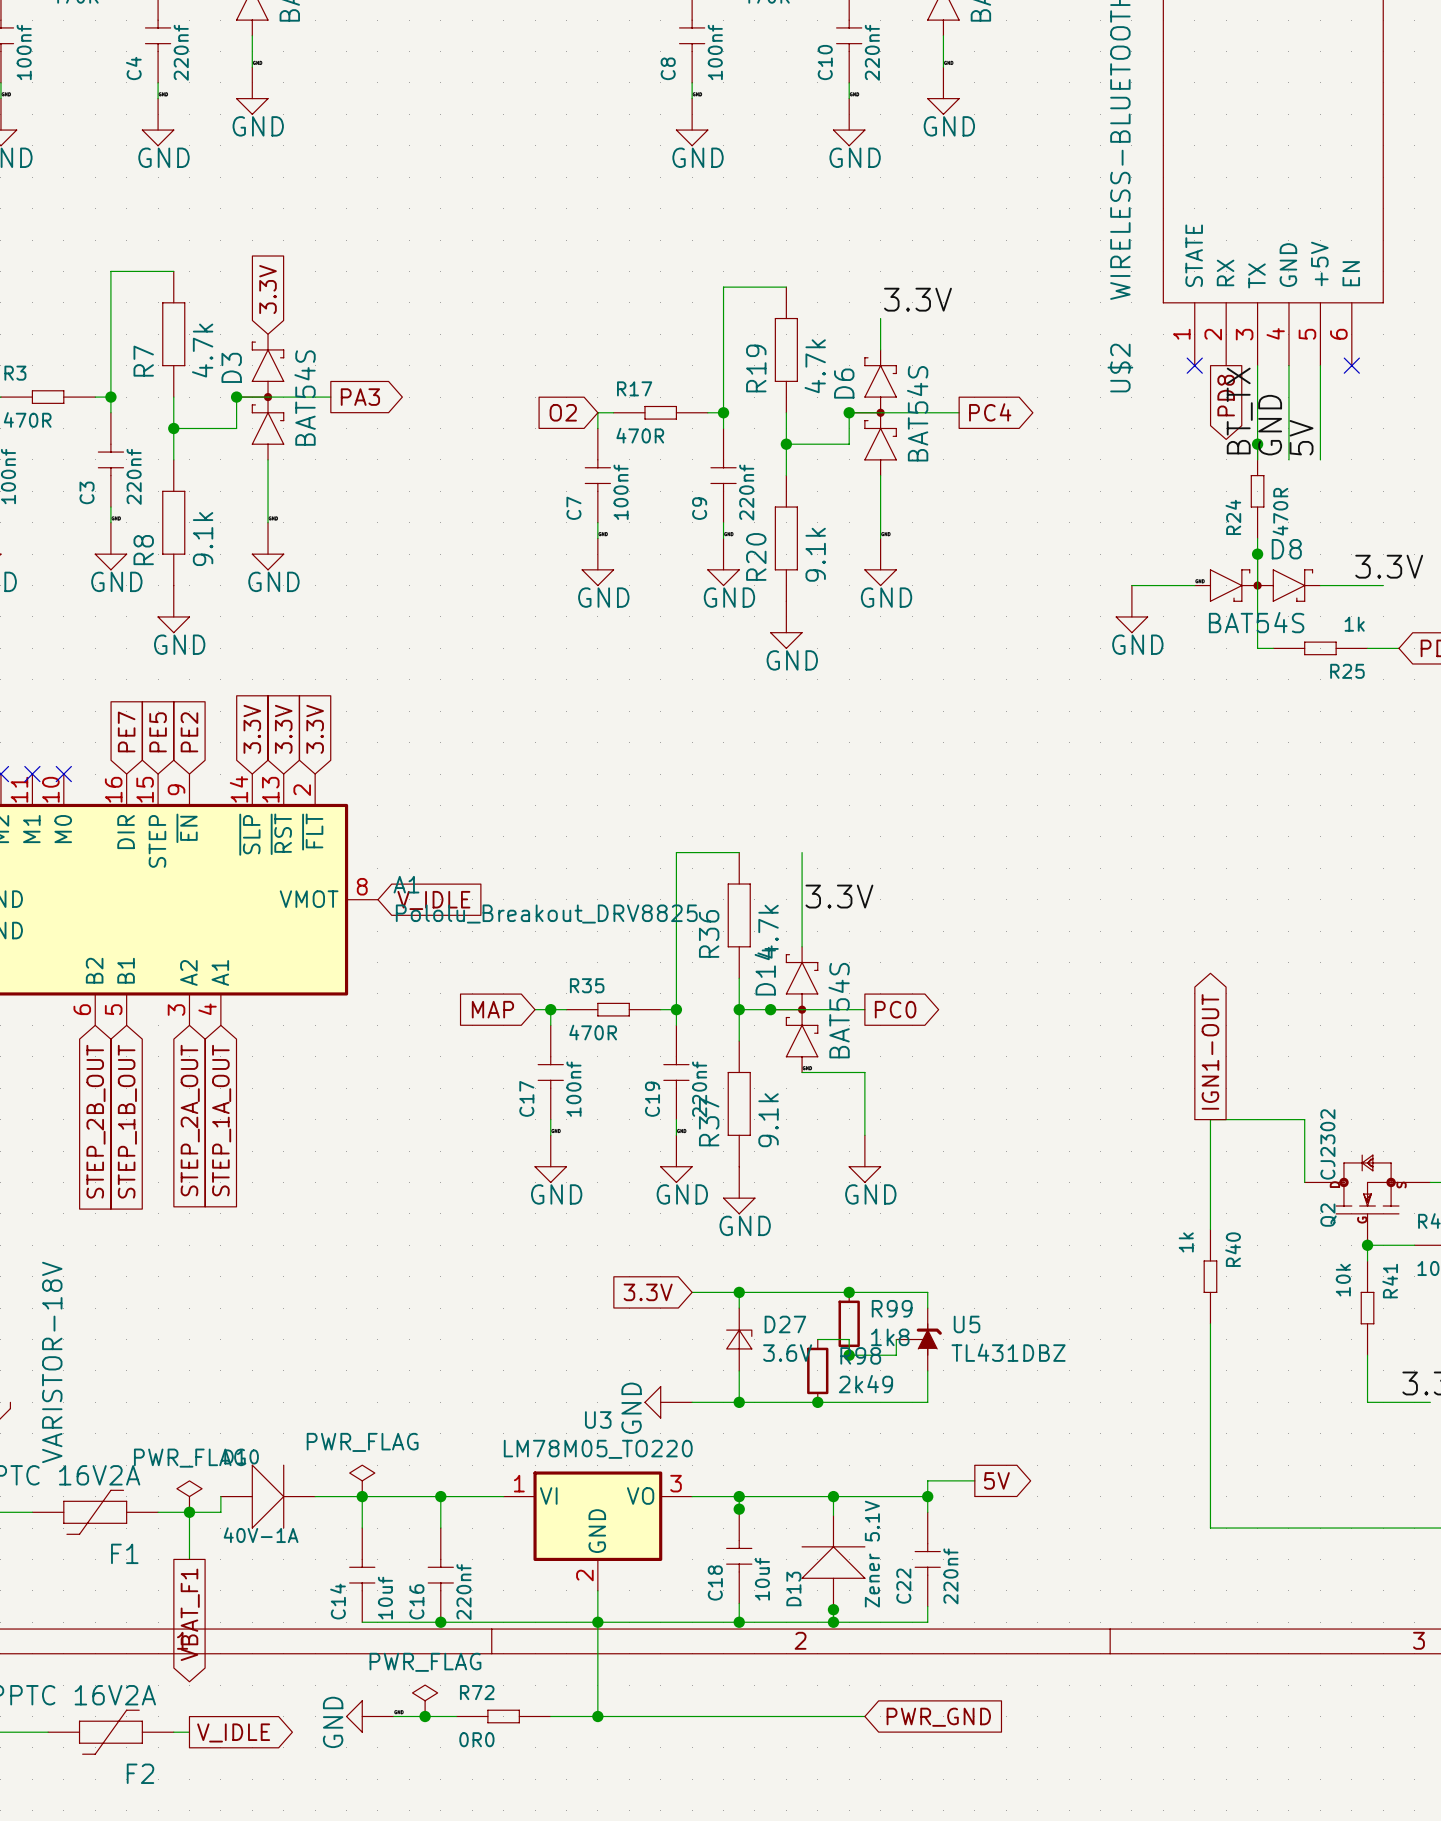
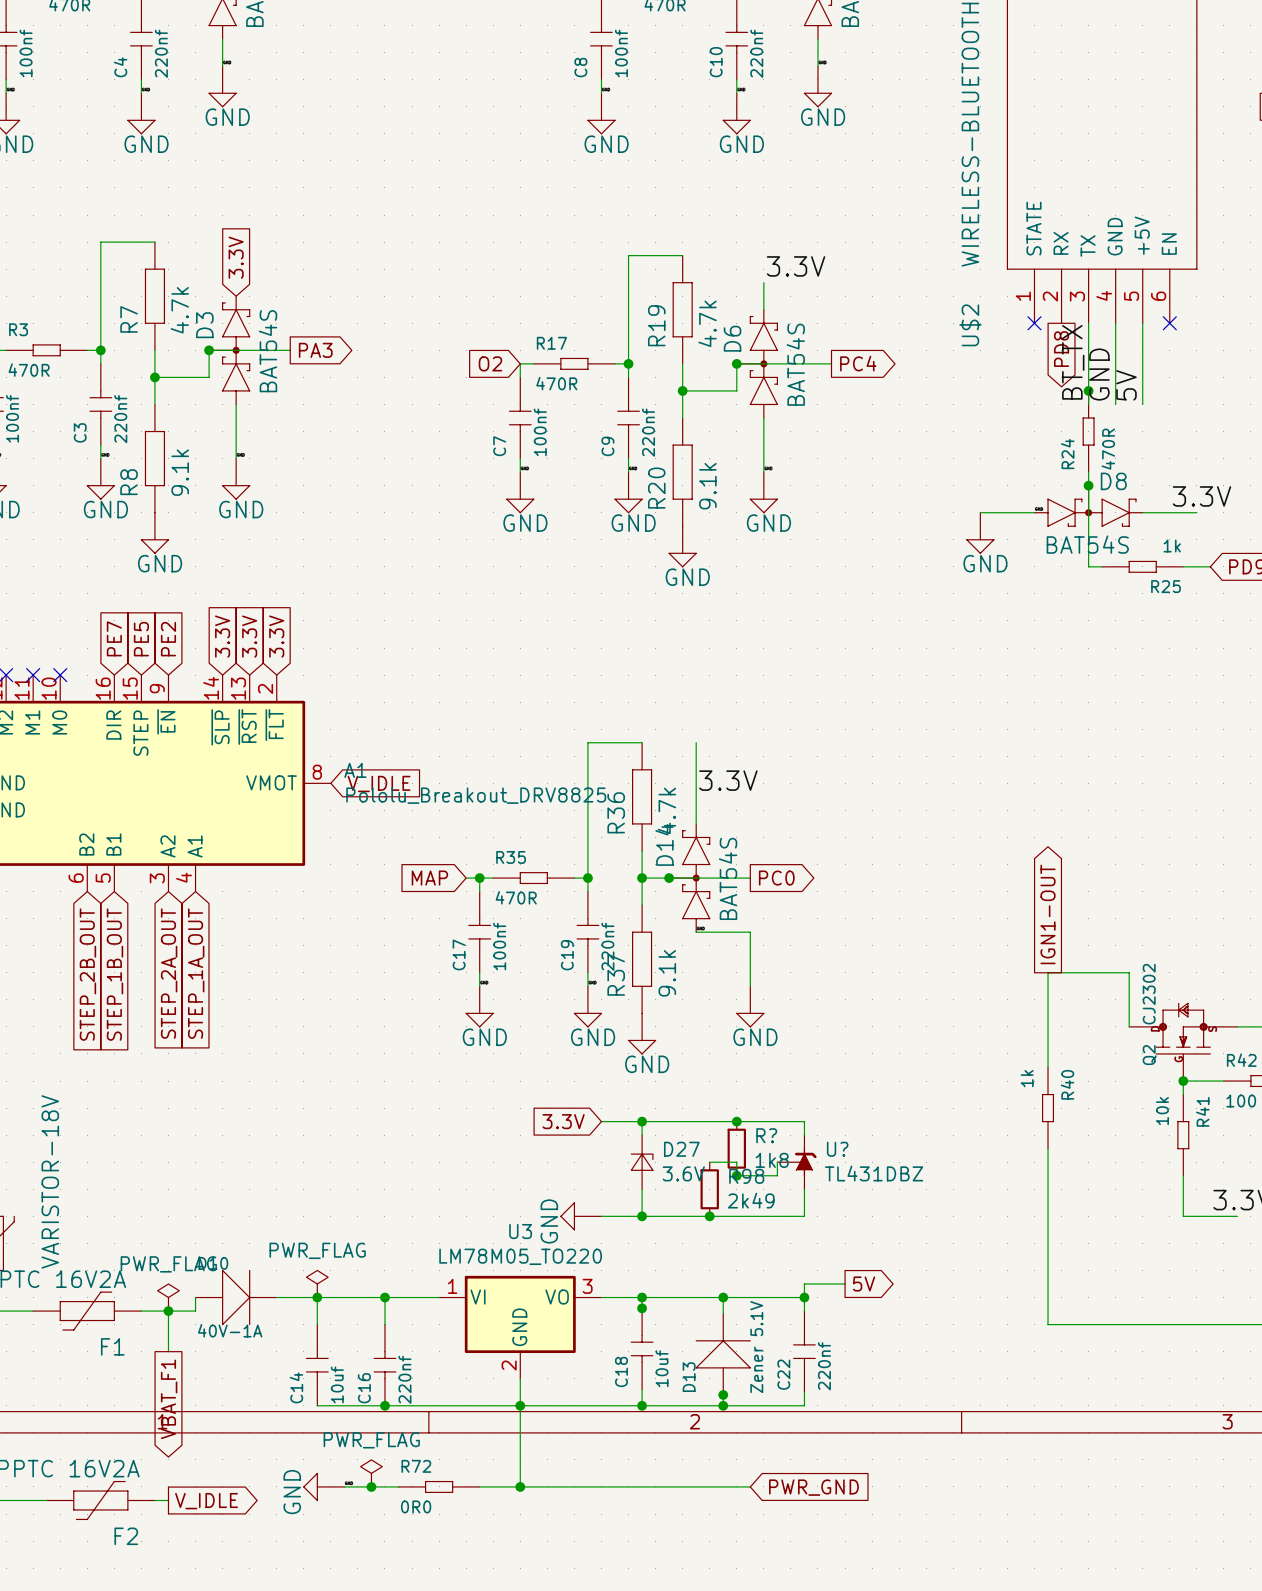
R99 name: R99 (892, 1308) -> R? (766, 1135)
U5 name: U5 (967, 1324) -> U? (837, 1149)

